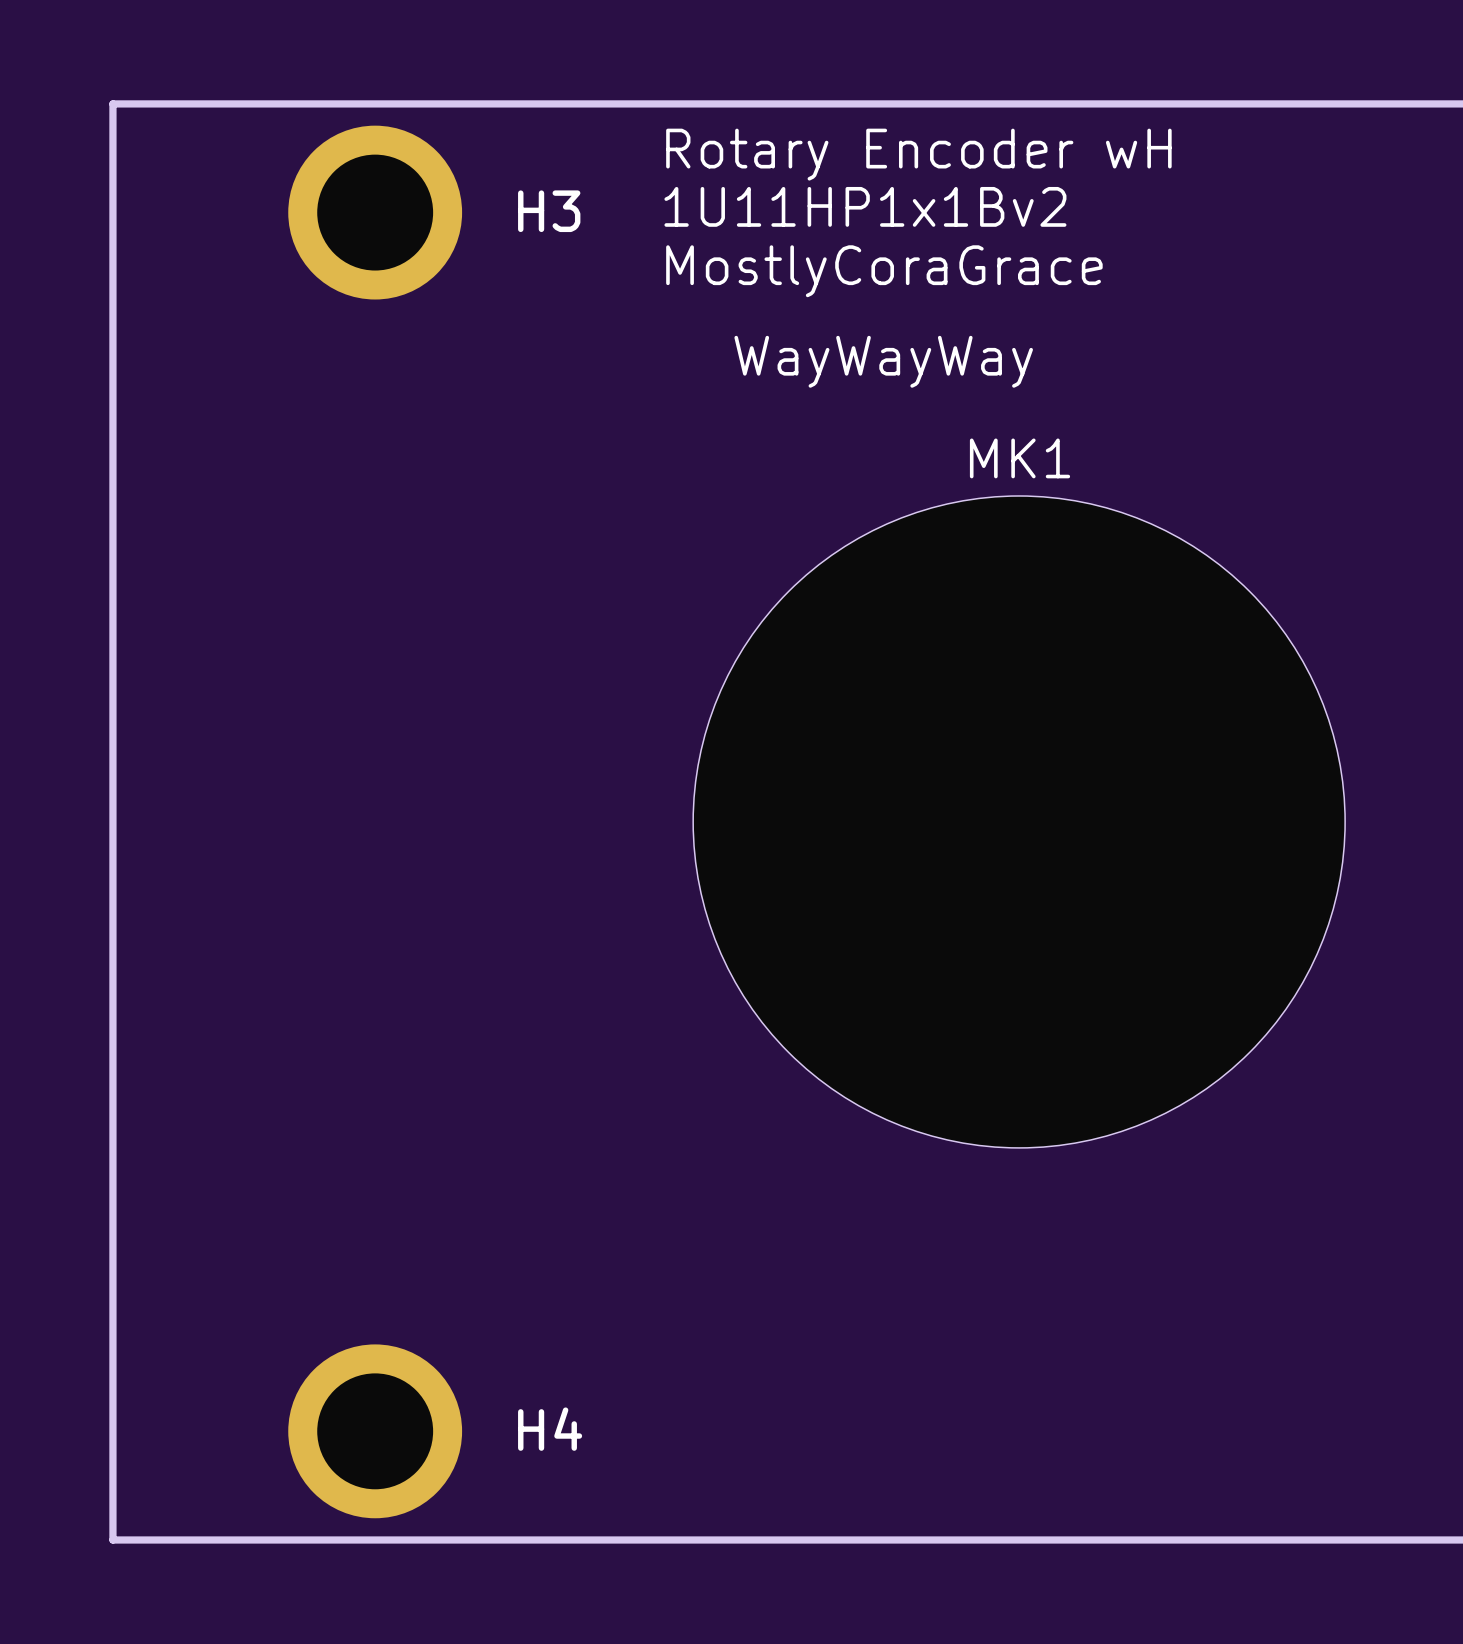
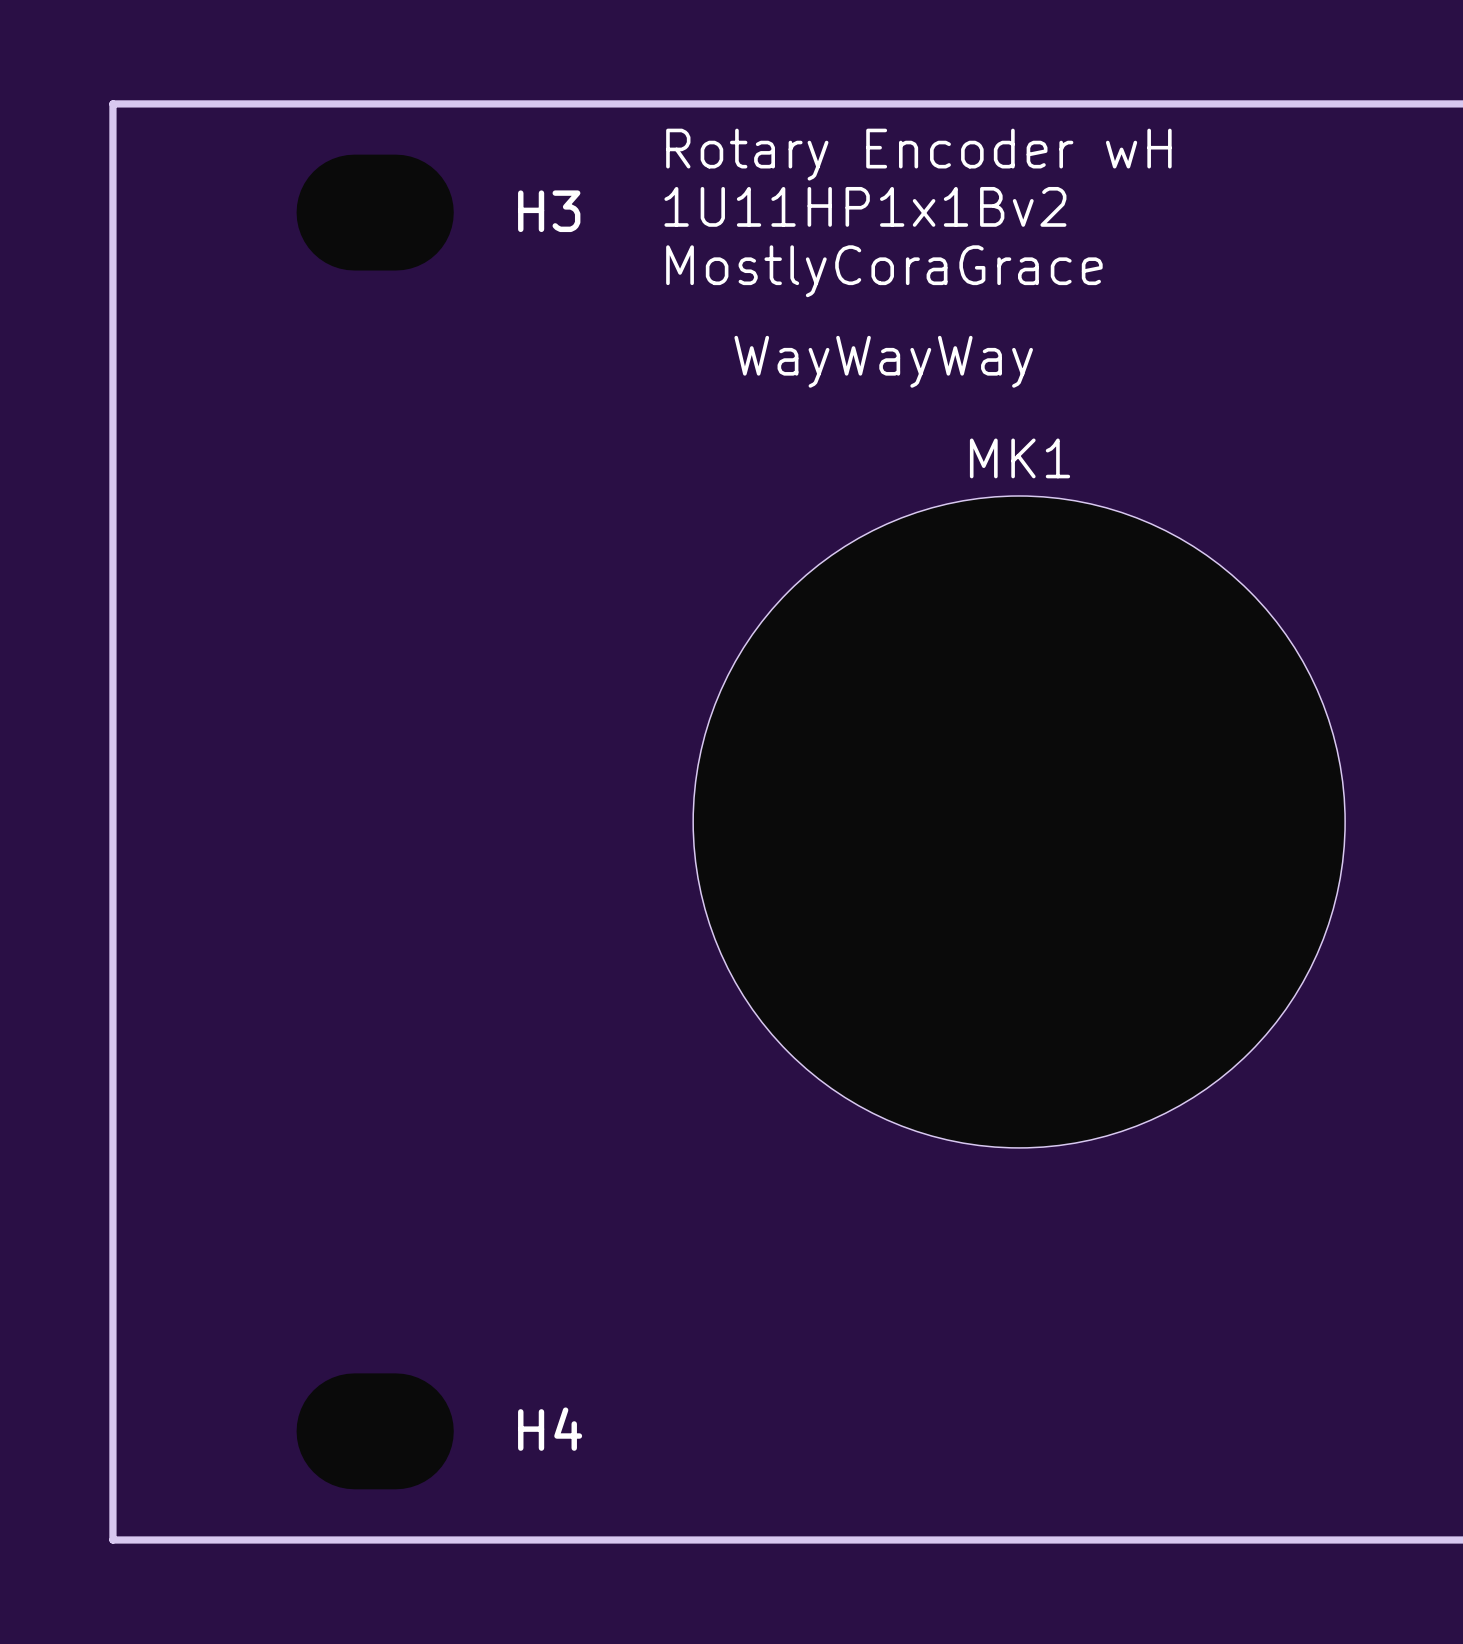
H3 footprint: [288, 125, 463, 300] -> [296, 154, 454, 271]
H4 footprint: [288, 1344, 463, 1519] -> [296, 1373, 454, 1490]

